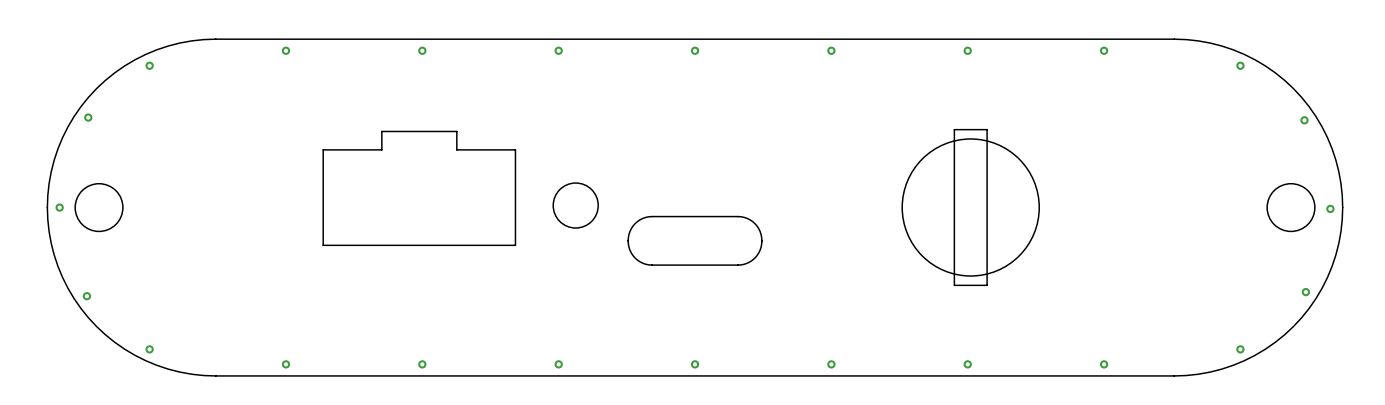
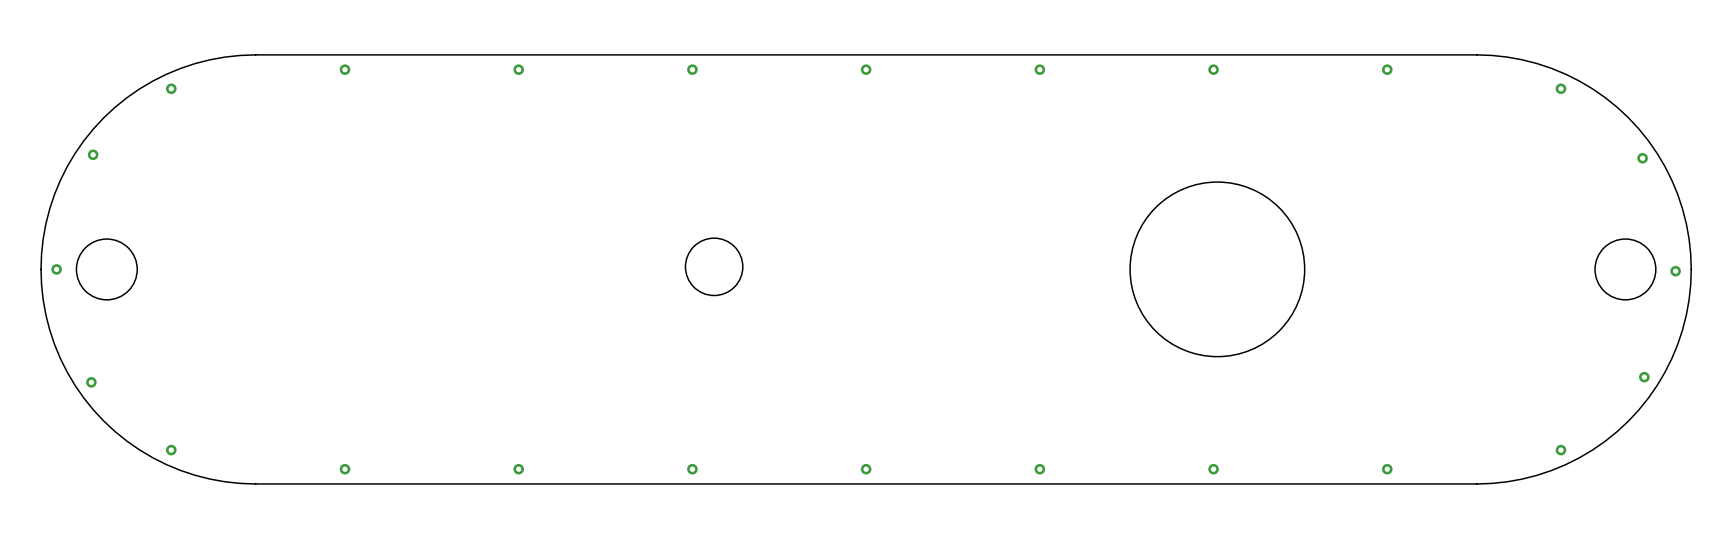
board edge: (954, 129) (987, 129) (987, 285) (954, 285) (954, 129) -> none
board edge: (381, 131) (456, 131) (456, 149) (515, 149) (515, 245) (323, 245) (323, 149) (381, 149) (381, 131) -> none
board edge: (652, 216) (744, 217) (752, 221) (758, 228) (761, 237) (761, 247) (752, 260) (741, 264) (645, 264) (637, 260) (631, 253) (628, 237) (631, 228) (637, 221) (652, 216) -> none

